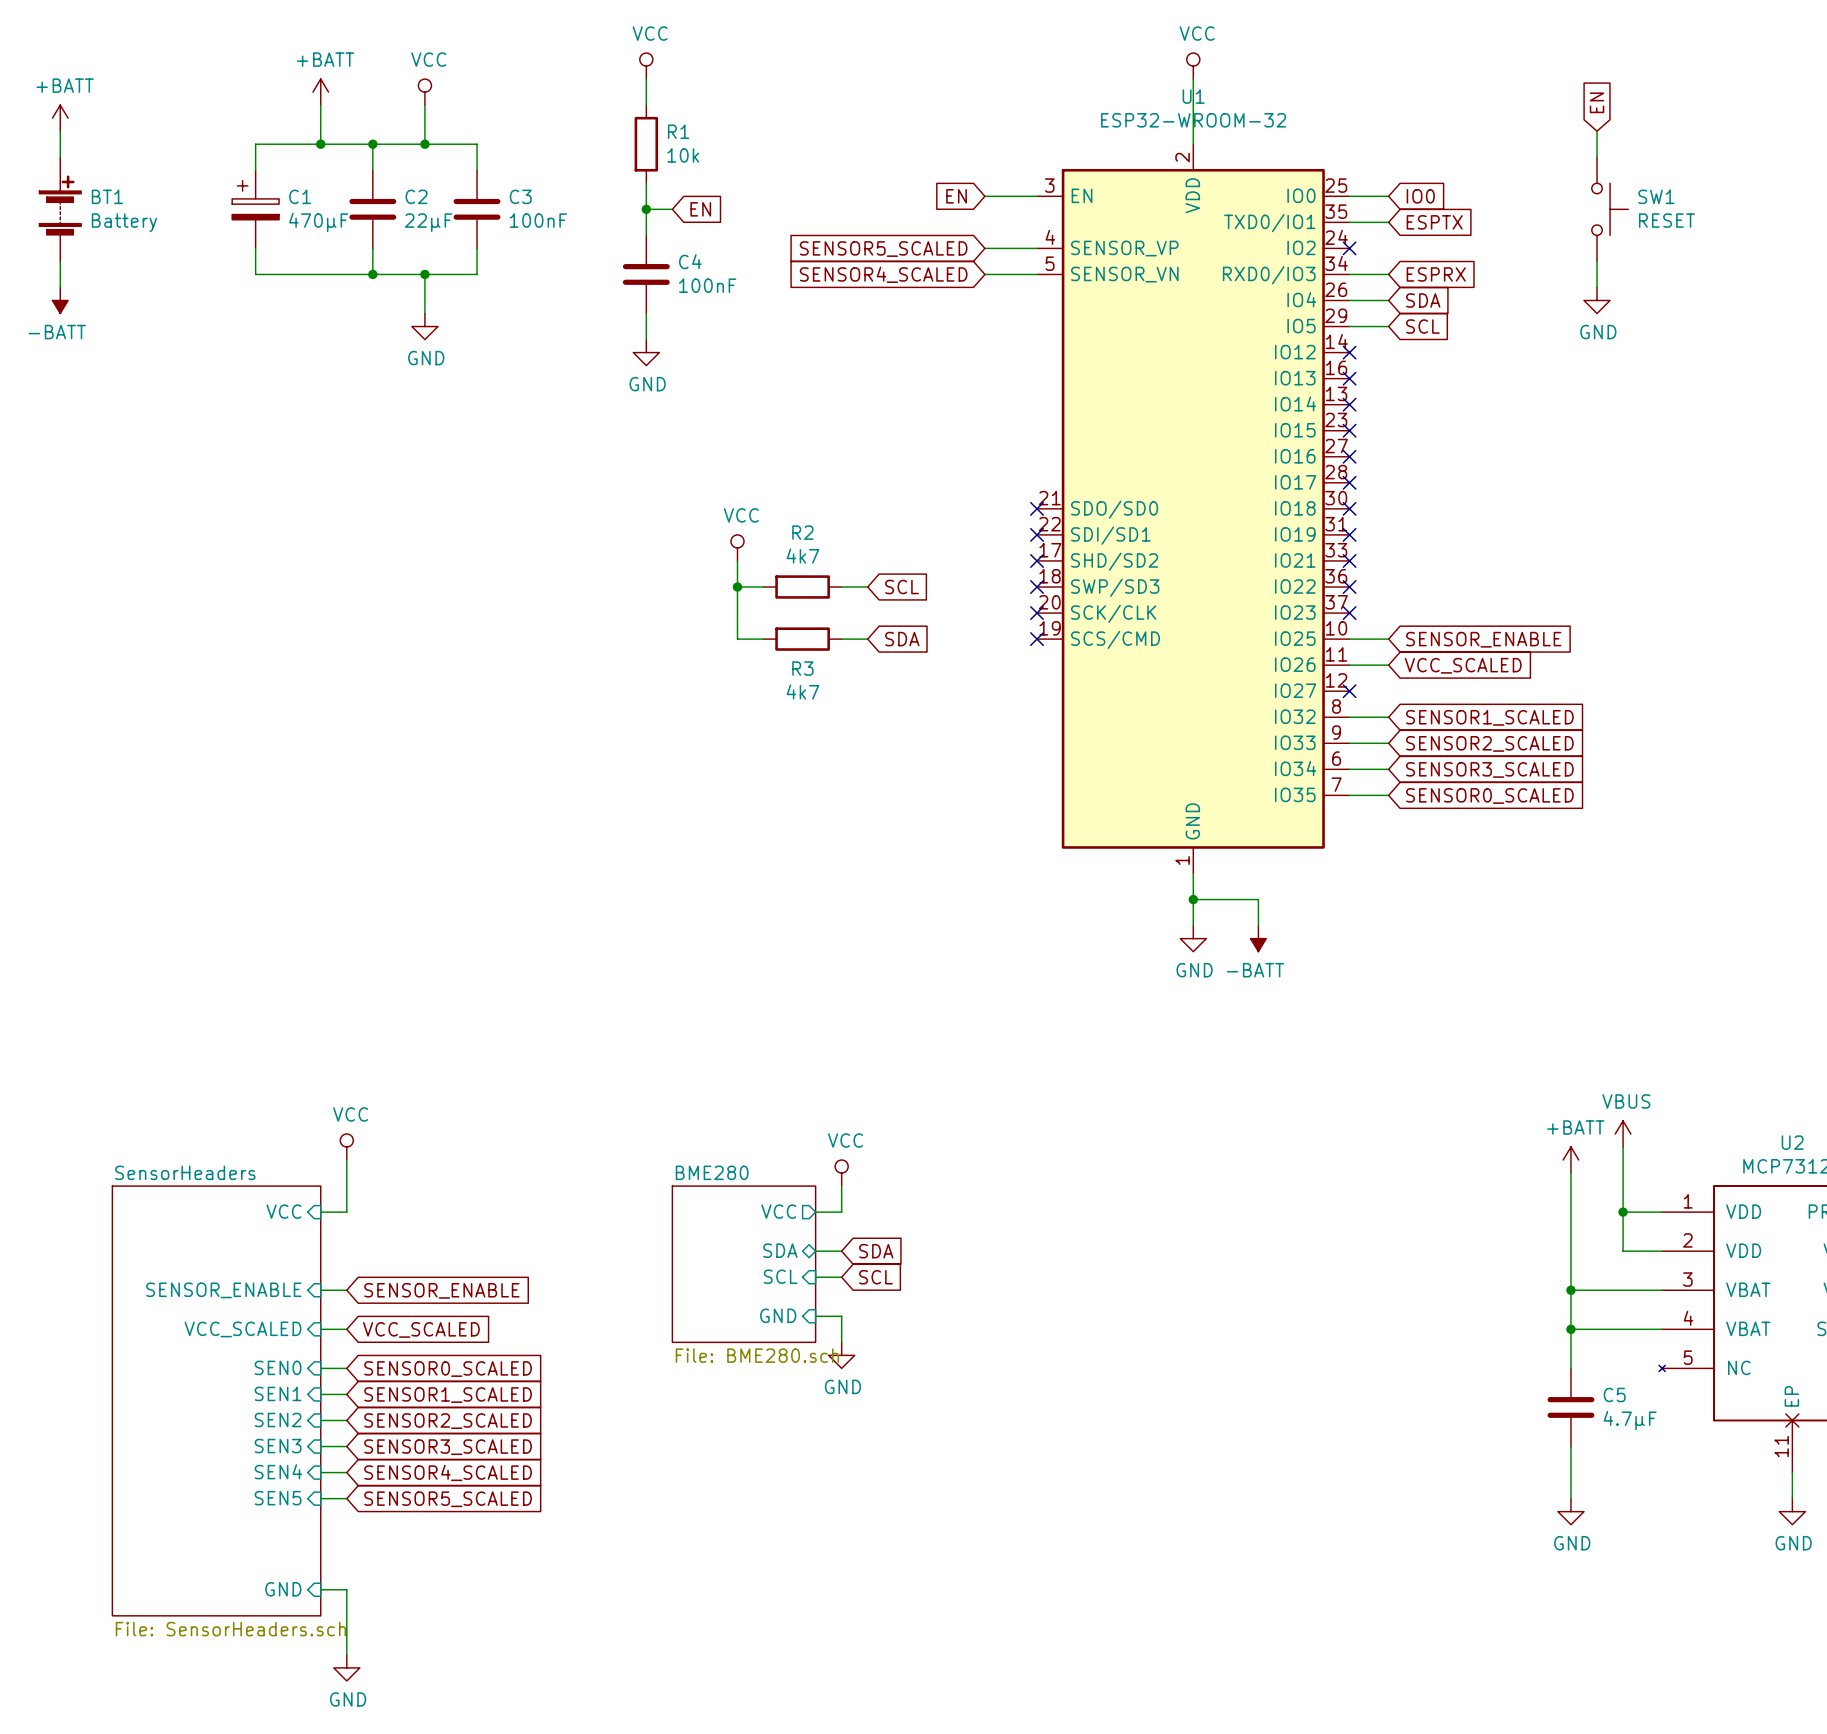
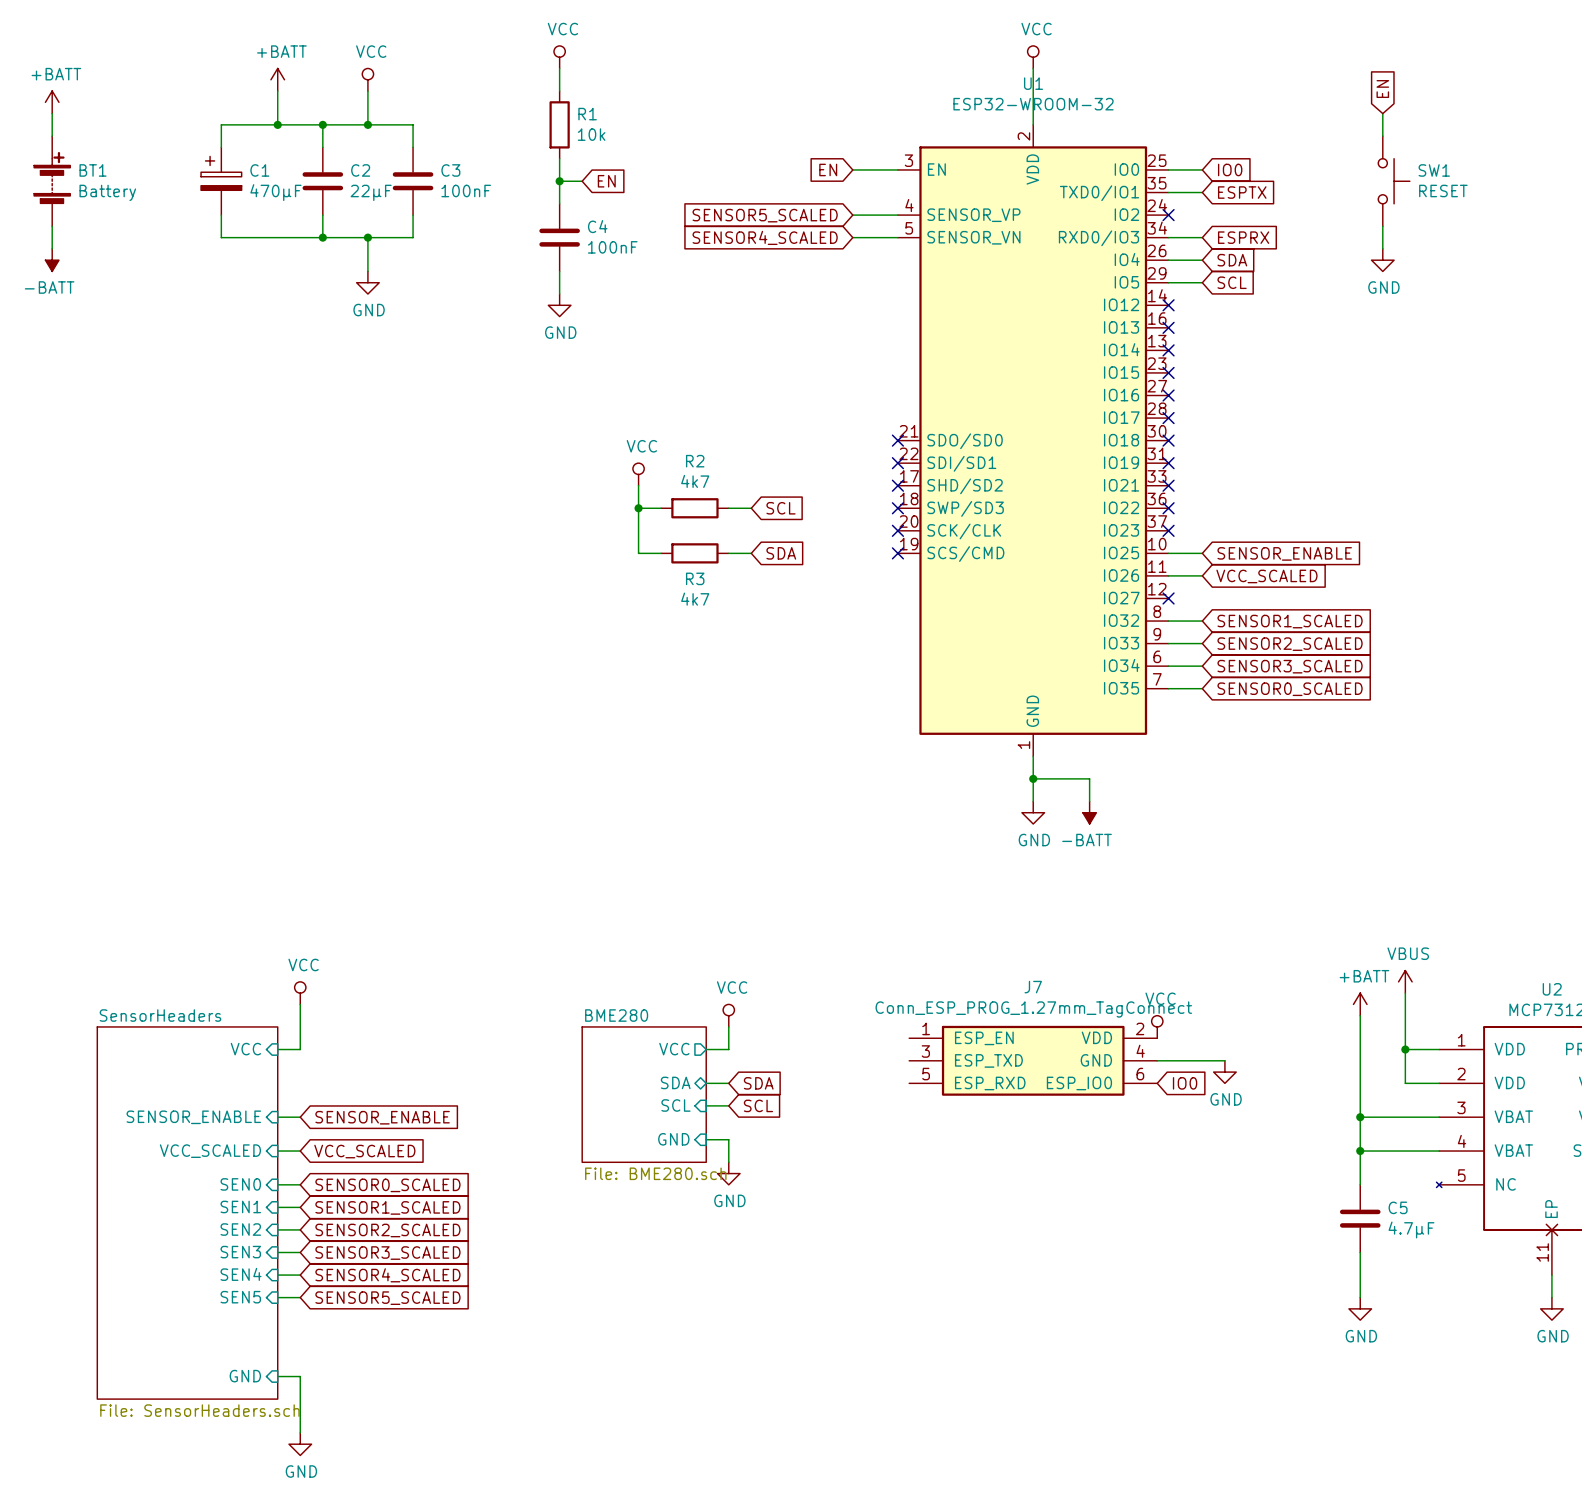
power symbol: none -> VCC (1157, 1026)
J7: none -> Conn_ESP_PROG_1.27mm_TagConnect (1033, 1060)
wire: none -> (1157, 1060) (1224, 1060)
power symbol: none -> GND (1224, 1072)
global label: none -> IO0 (1185, 1083)

